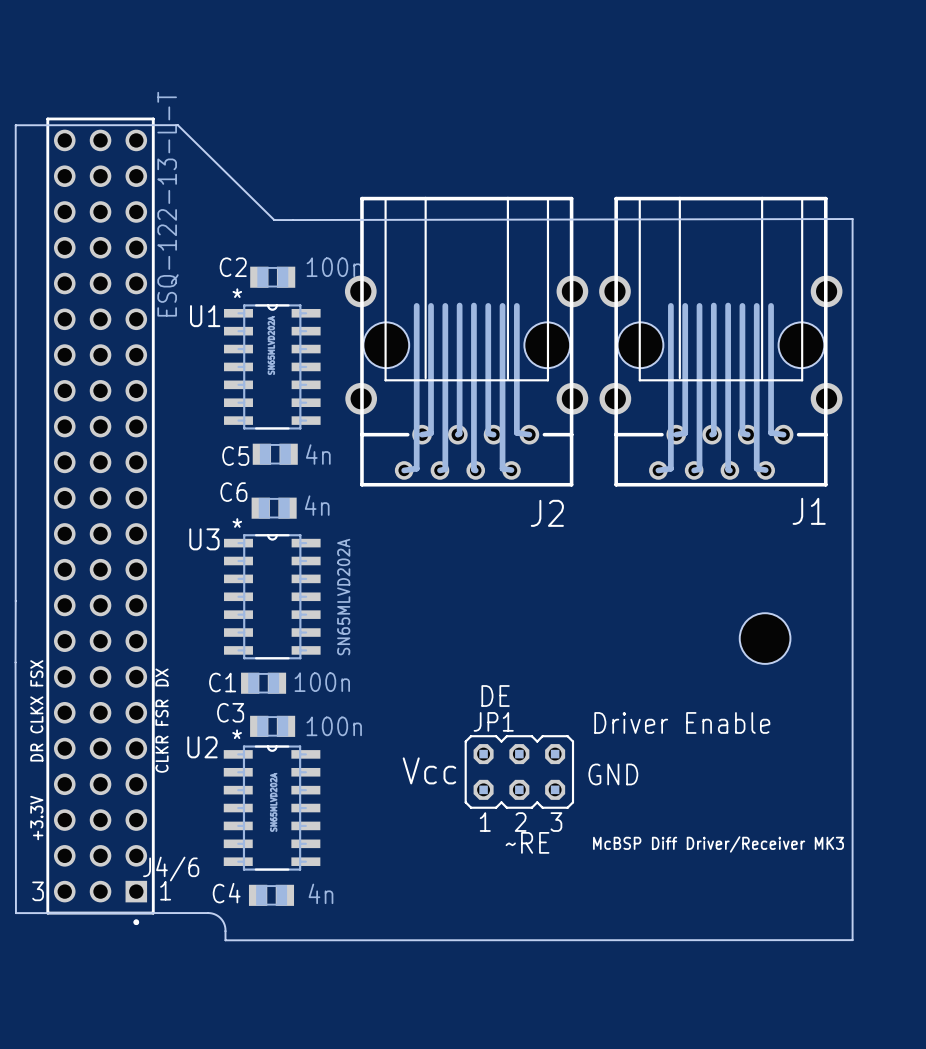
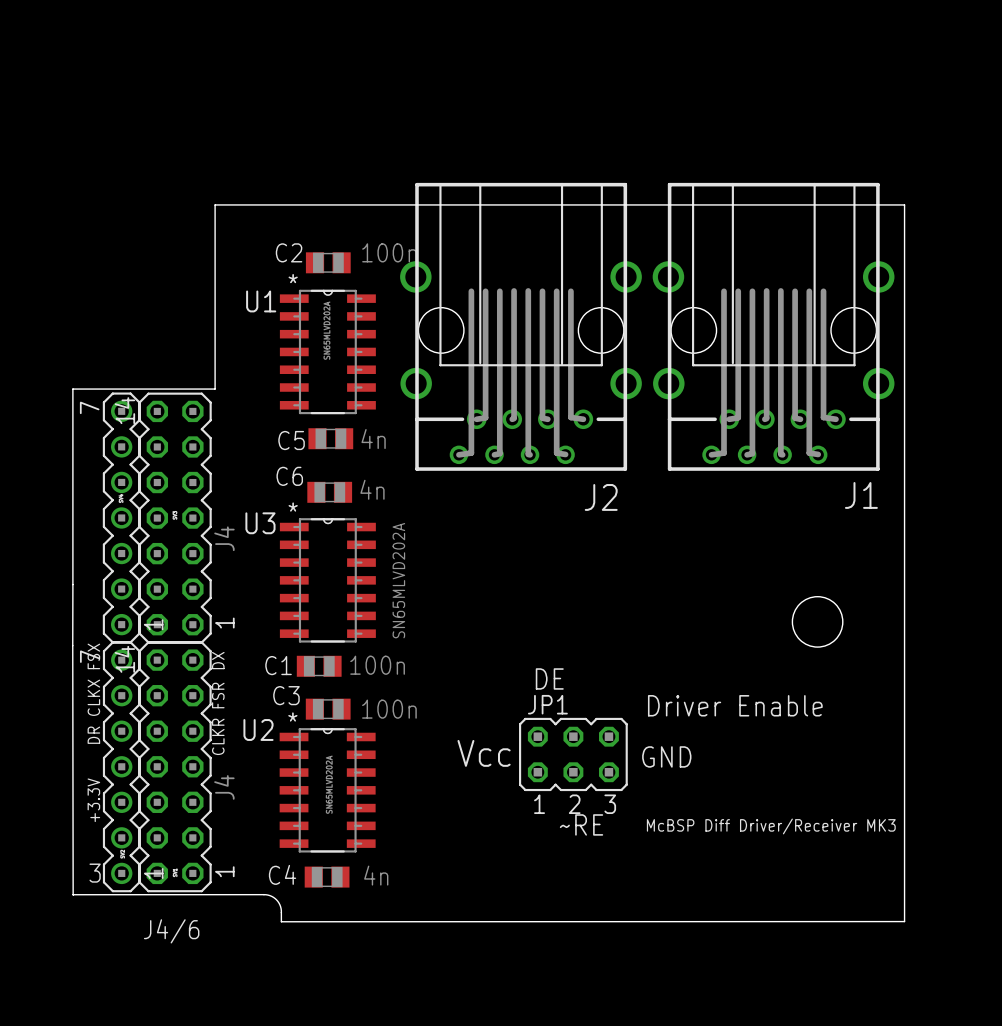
board edge: (852, 219) (274, 220) (177, 125) (15, 125) (15, 404) -> (904, 204) (215, 204) (215, 389) (72, 389)
J4/6: ESQ-122-13-L-T (100, 521) -> none
part: none -> (121, 517)
part: none -> J4 (175, 518)
part: none -> (121, 766)
part: none -> J4 (175, 766)
text: 1 (165, 890) -> none
text: none -> J4/6 (171, 931)

